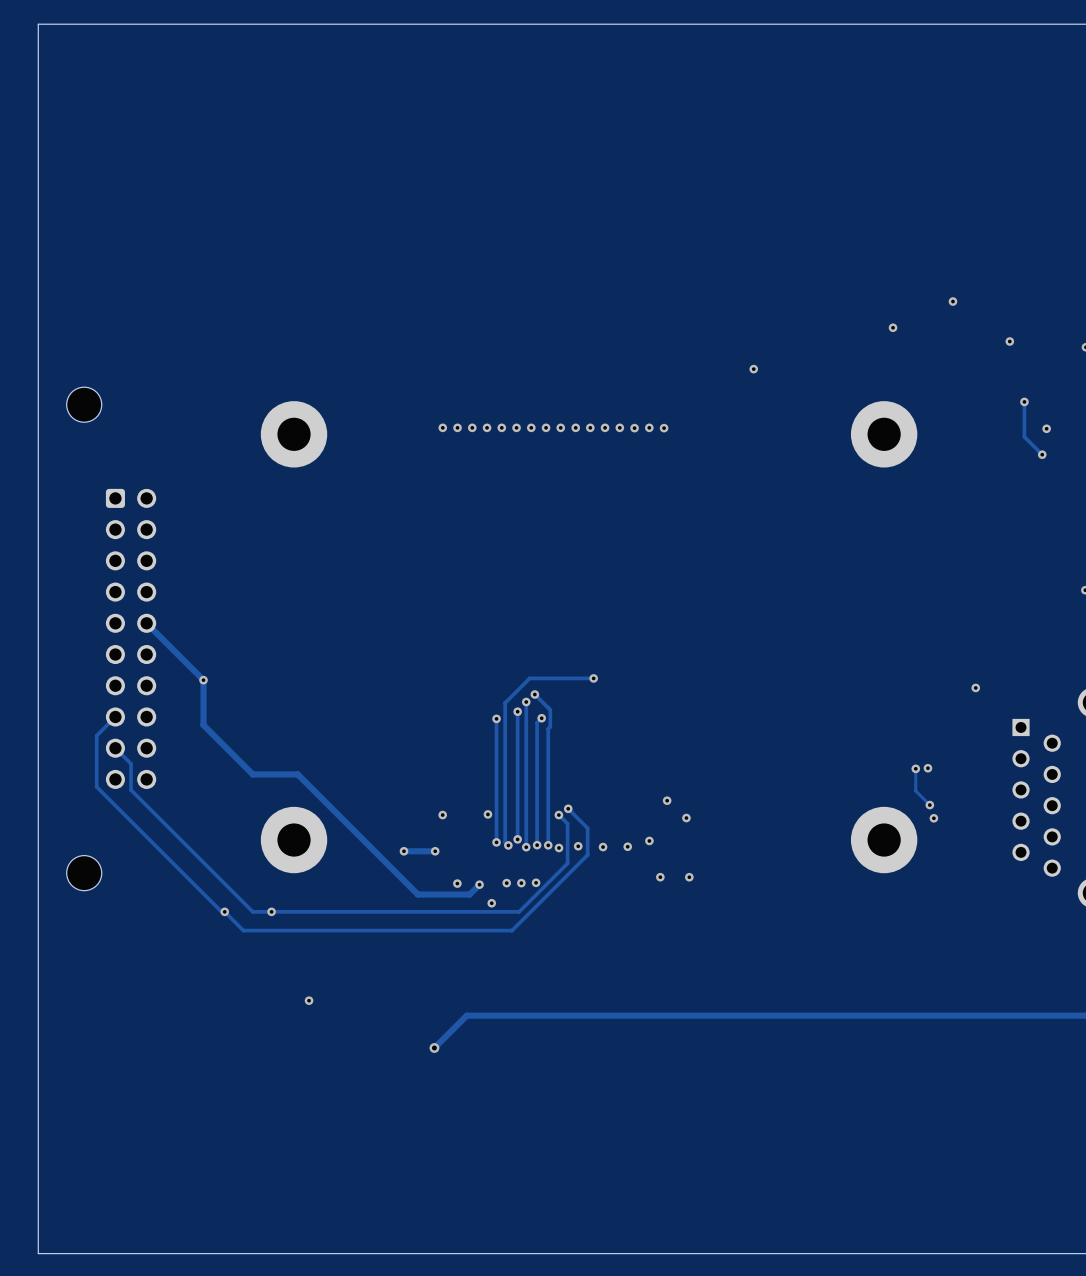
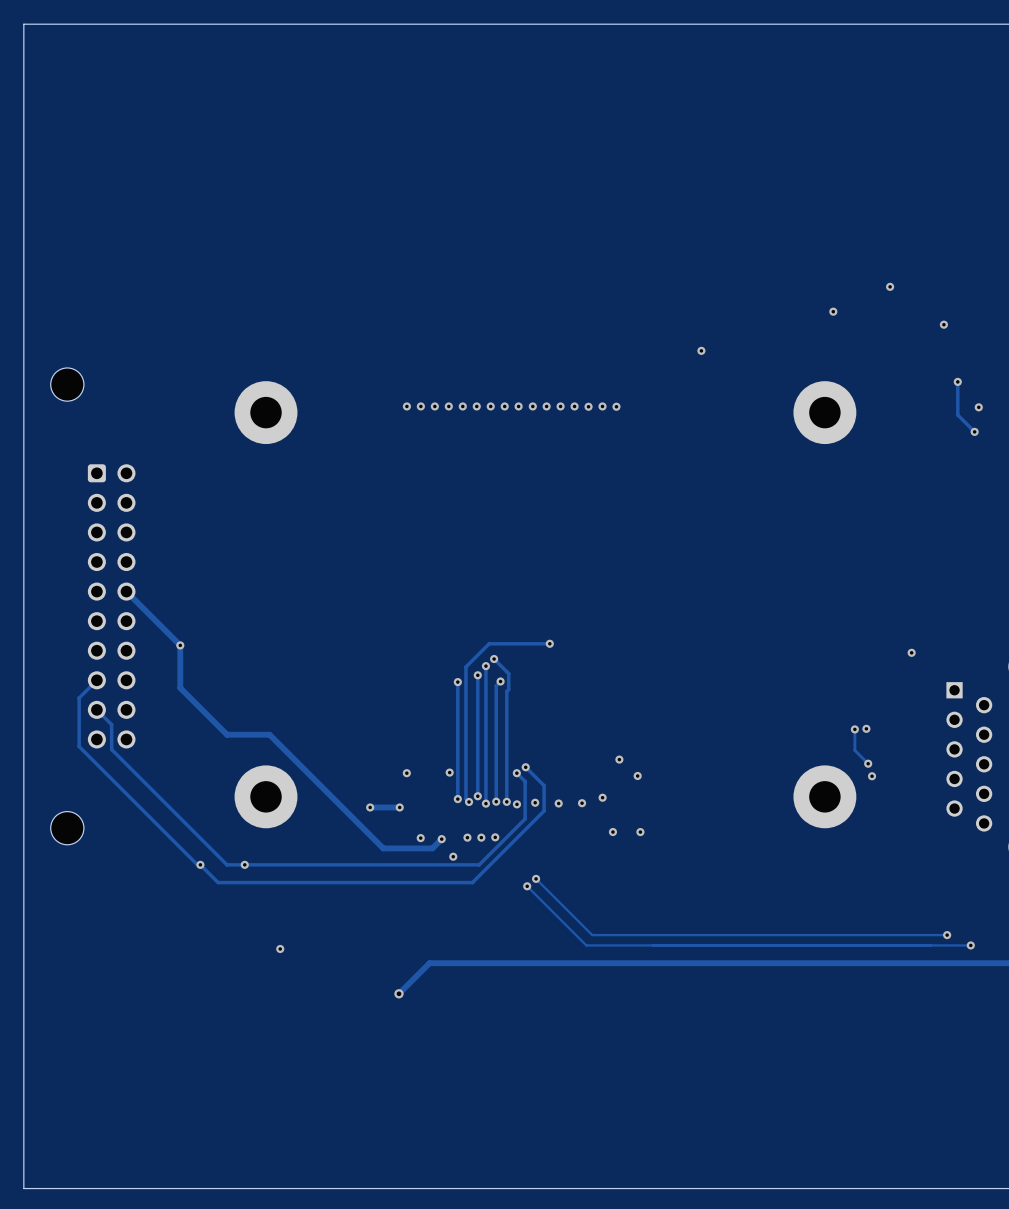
track: none -> (536, 878) (592, 935) (947, 935)
via: none -> (536, 878)
track: none -> (527, 886) (586, 945) (970, 945)
via: none -> (527, 886)
via: none -> (947, 935)
via: none -> (970, 945)

